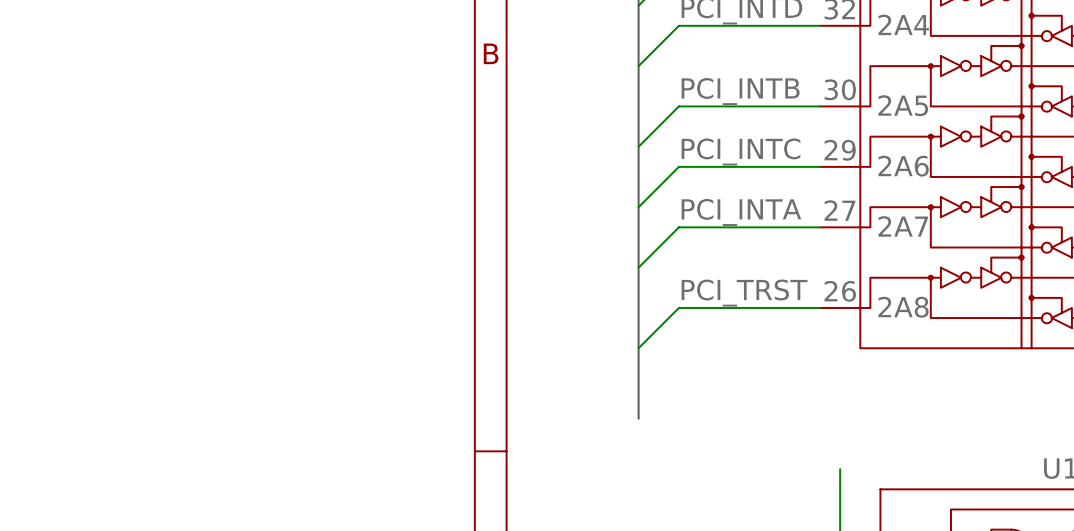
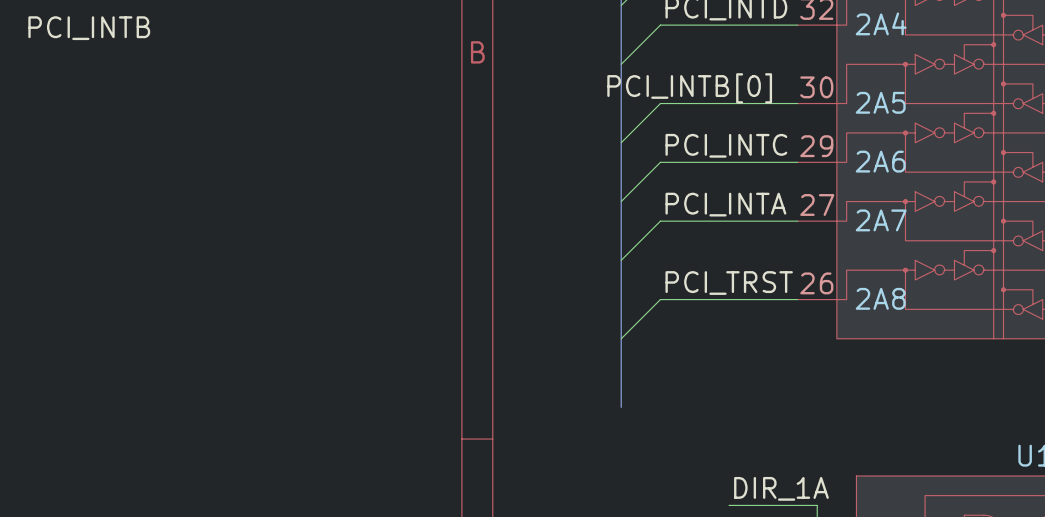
label: none -> PCI_INTB (89, 28)
label: PCI_INTB (740, 91) -> PCI_INTB[0] (689, 88)
wire: (840, 469) (840, 519) -> (729, 505) (817, 505)
label: none -> DIR_1A (781, 488)

